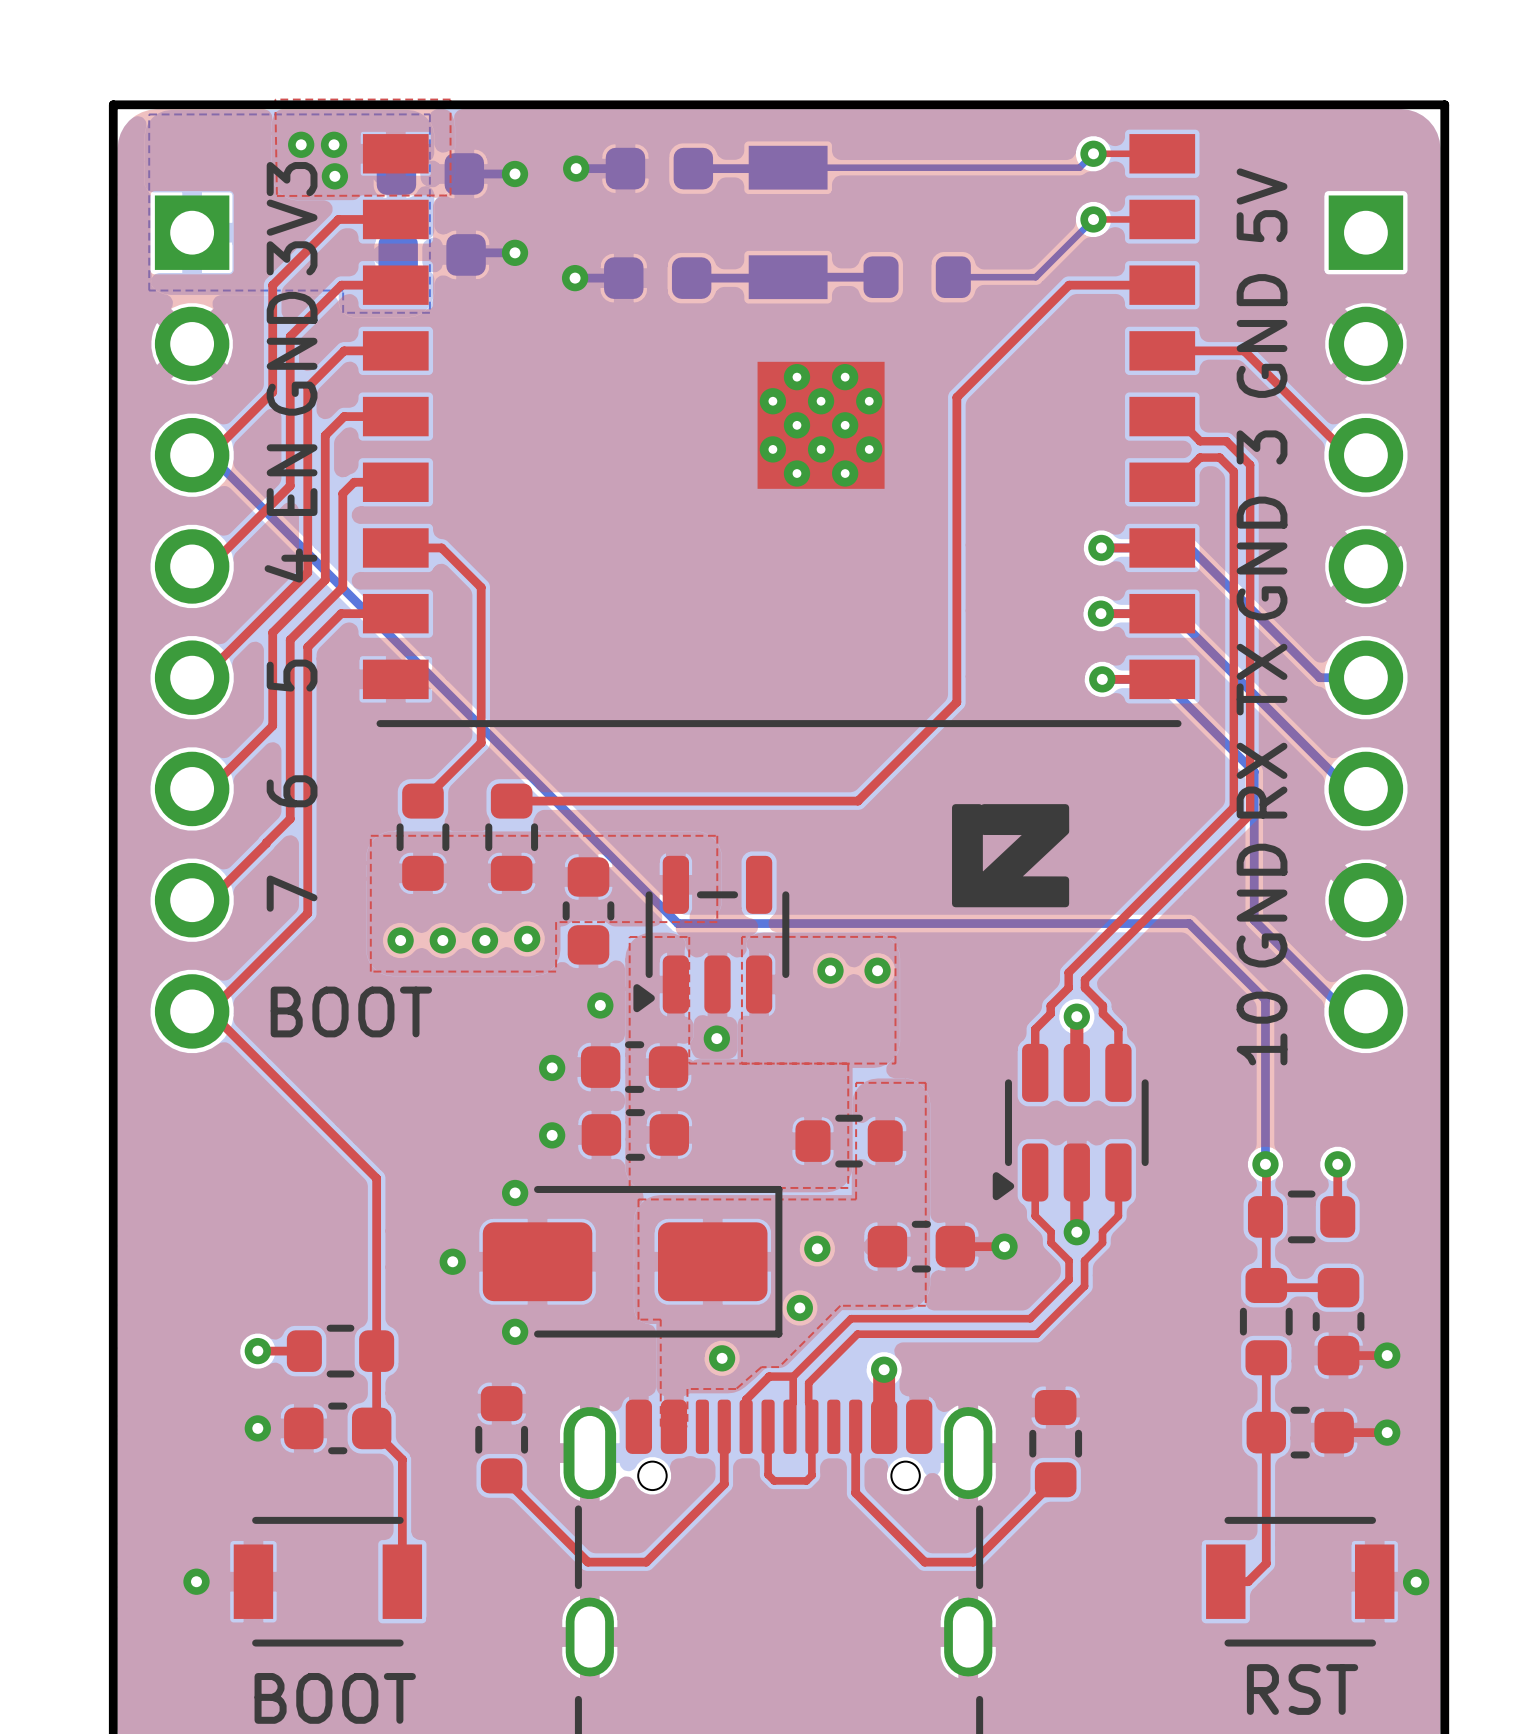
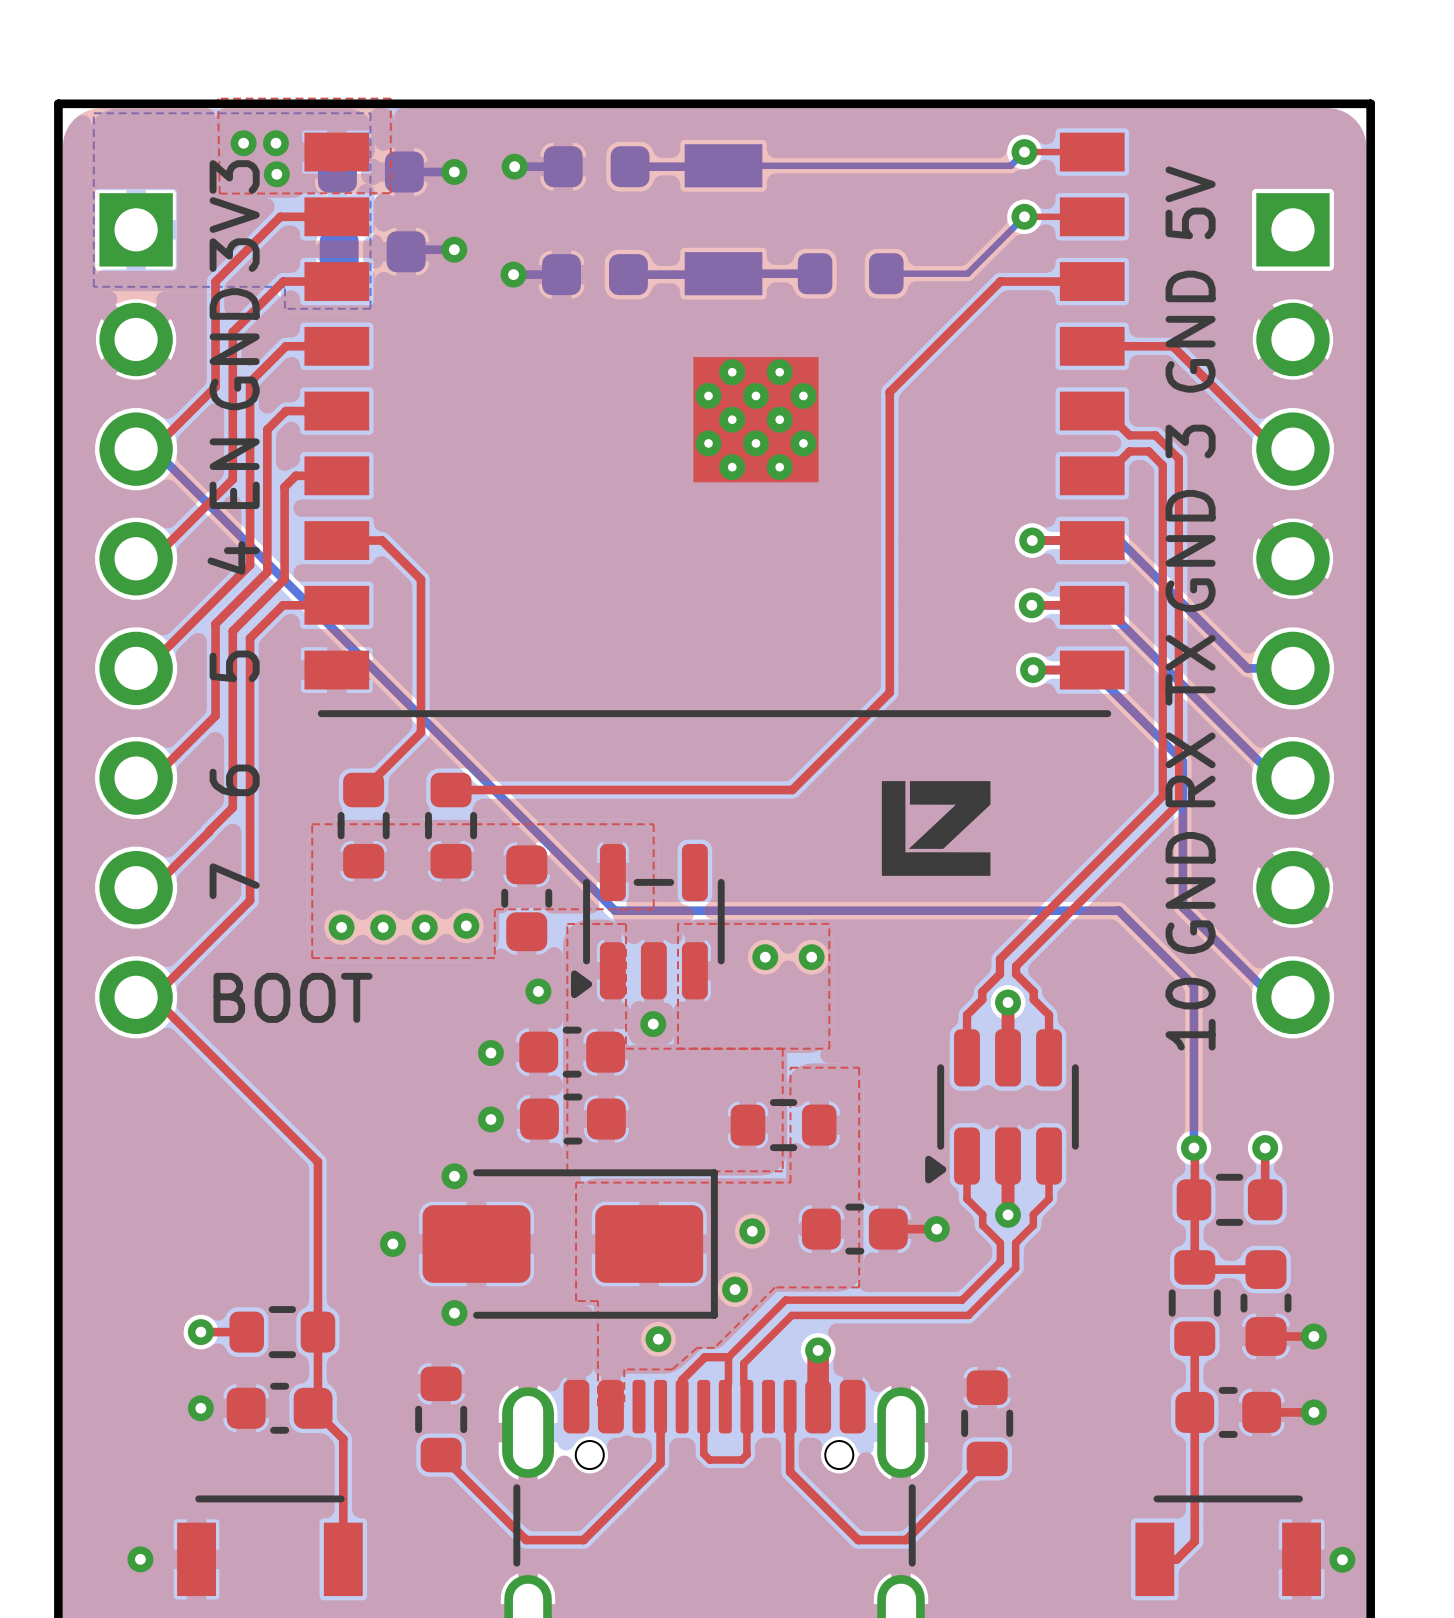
drawing shape: [952, 804, 1070, 908] -> [881, 781, 991, 876]

